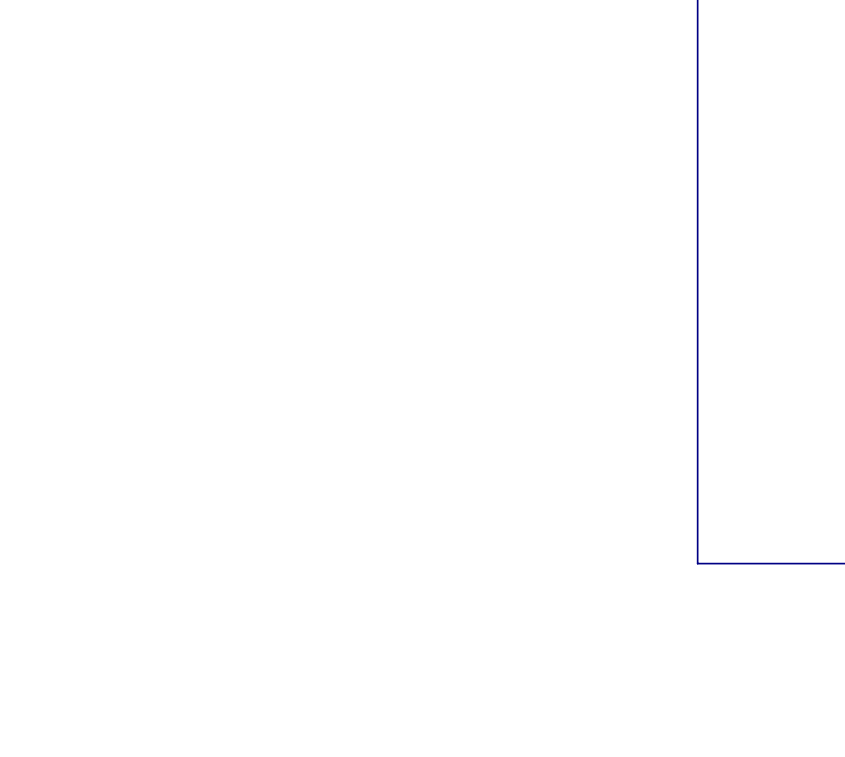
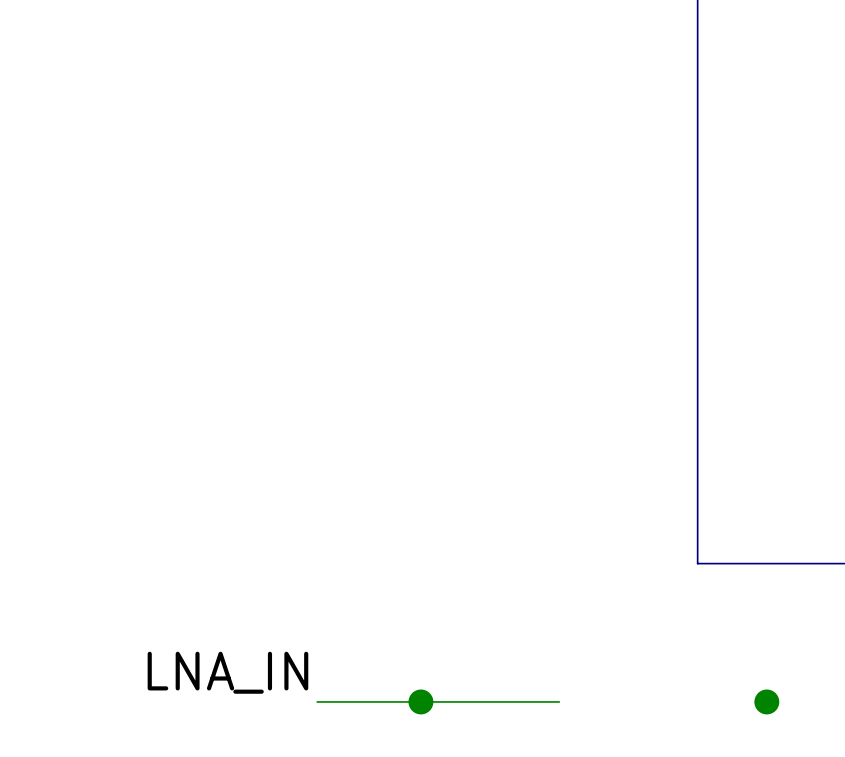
label: none -> LNA_IN (227, 672)
wire: none -> (317, 701) (559, 701)
junction: none -> (420, 701)
junction: none -> (766, 701)

